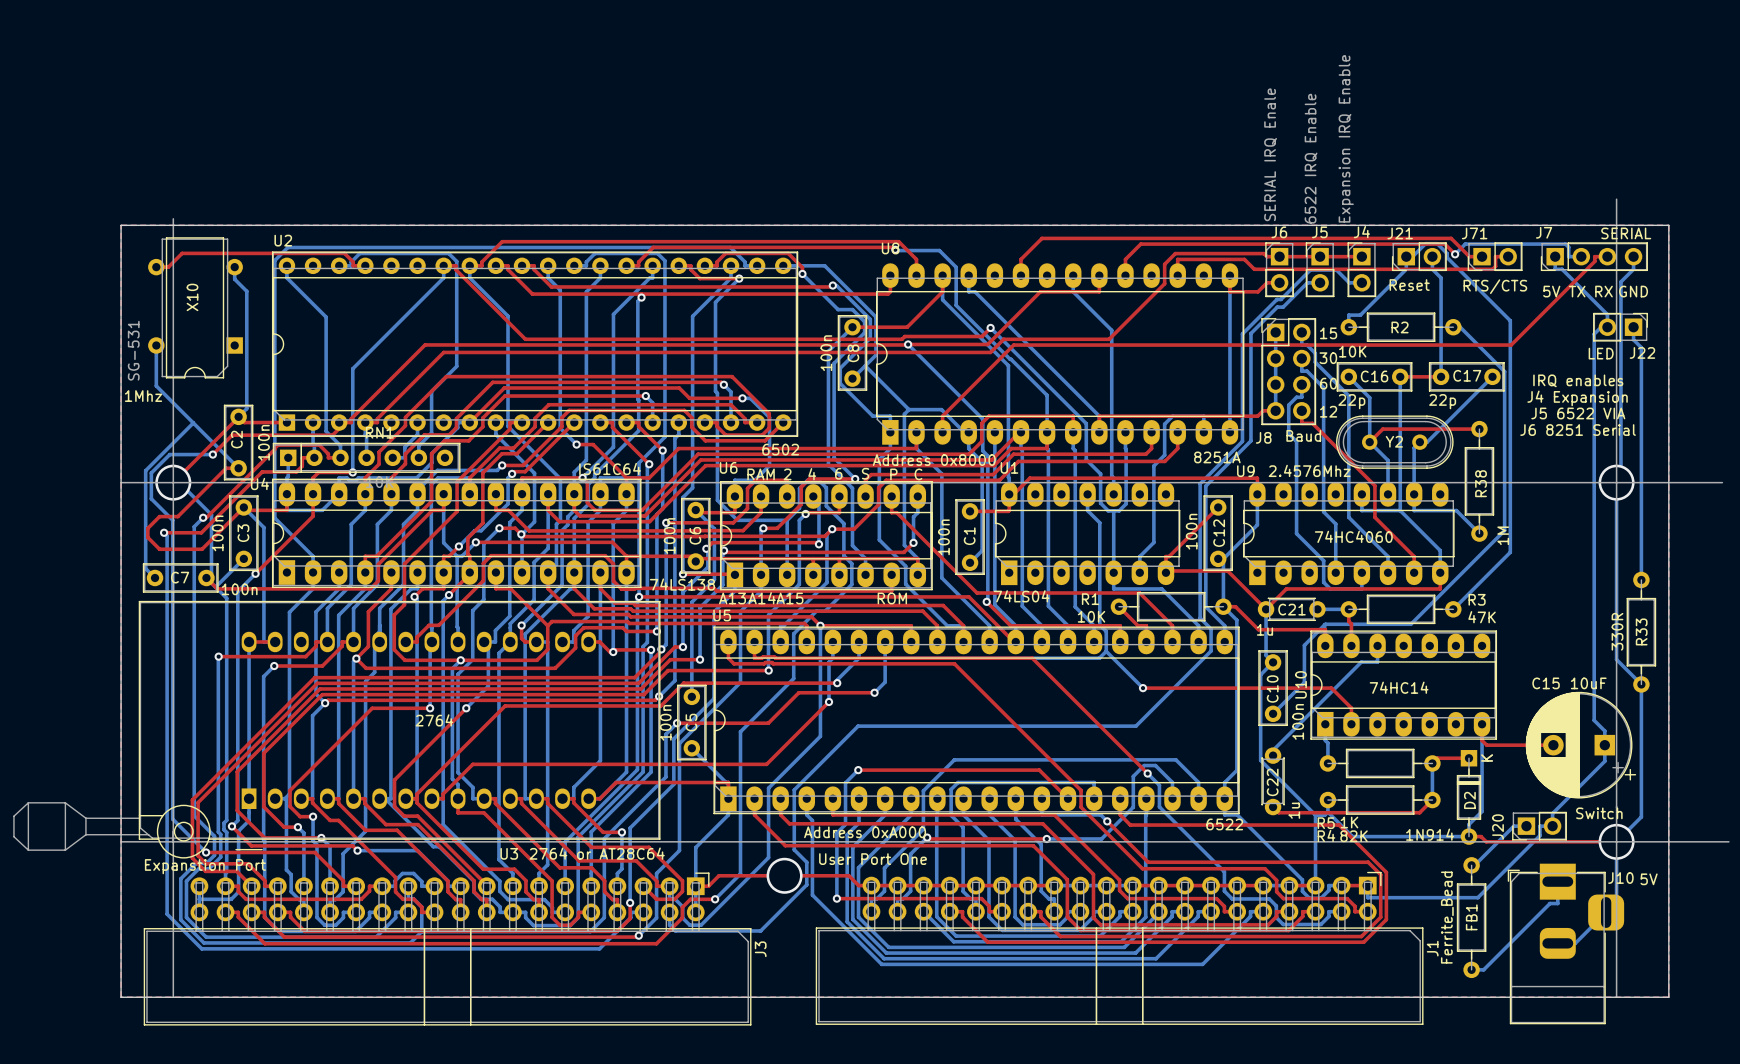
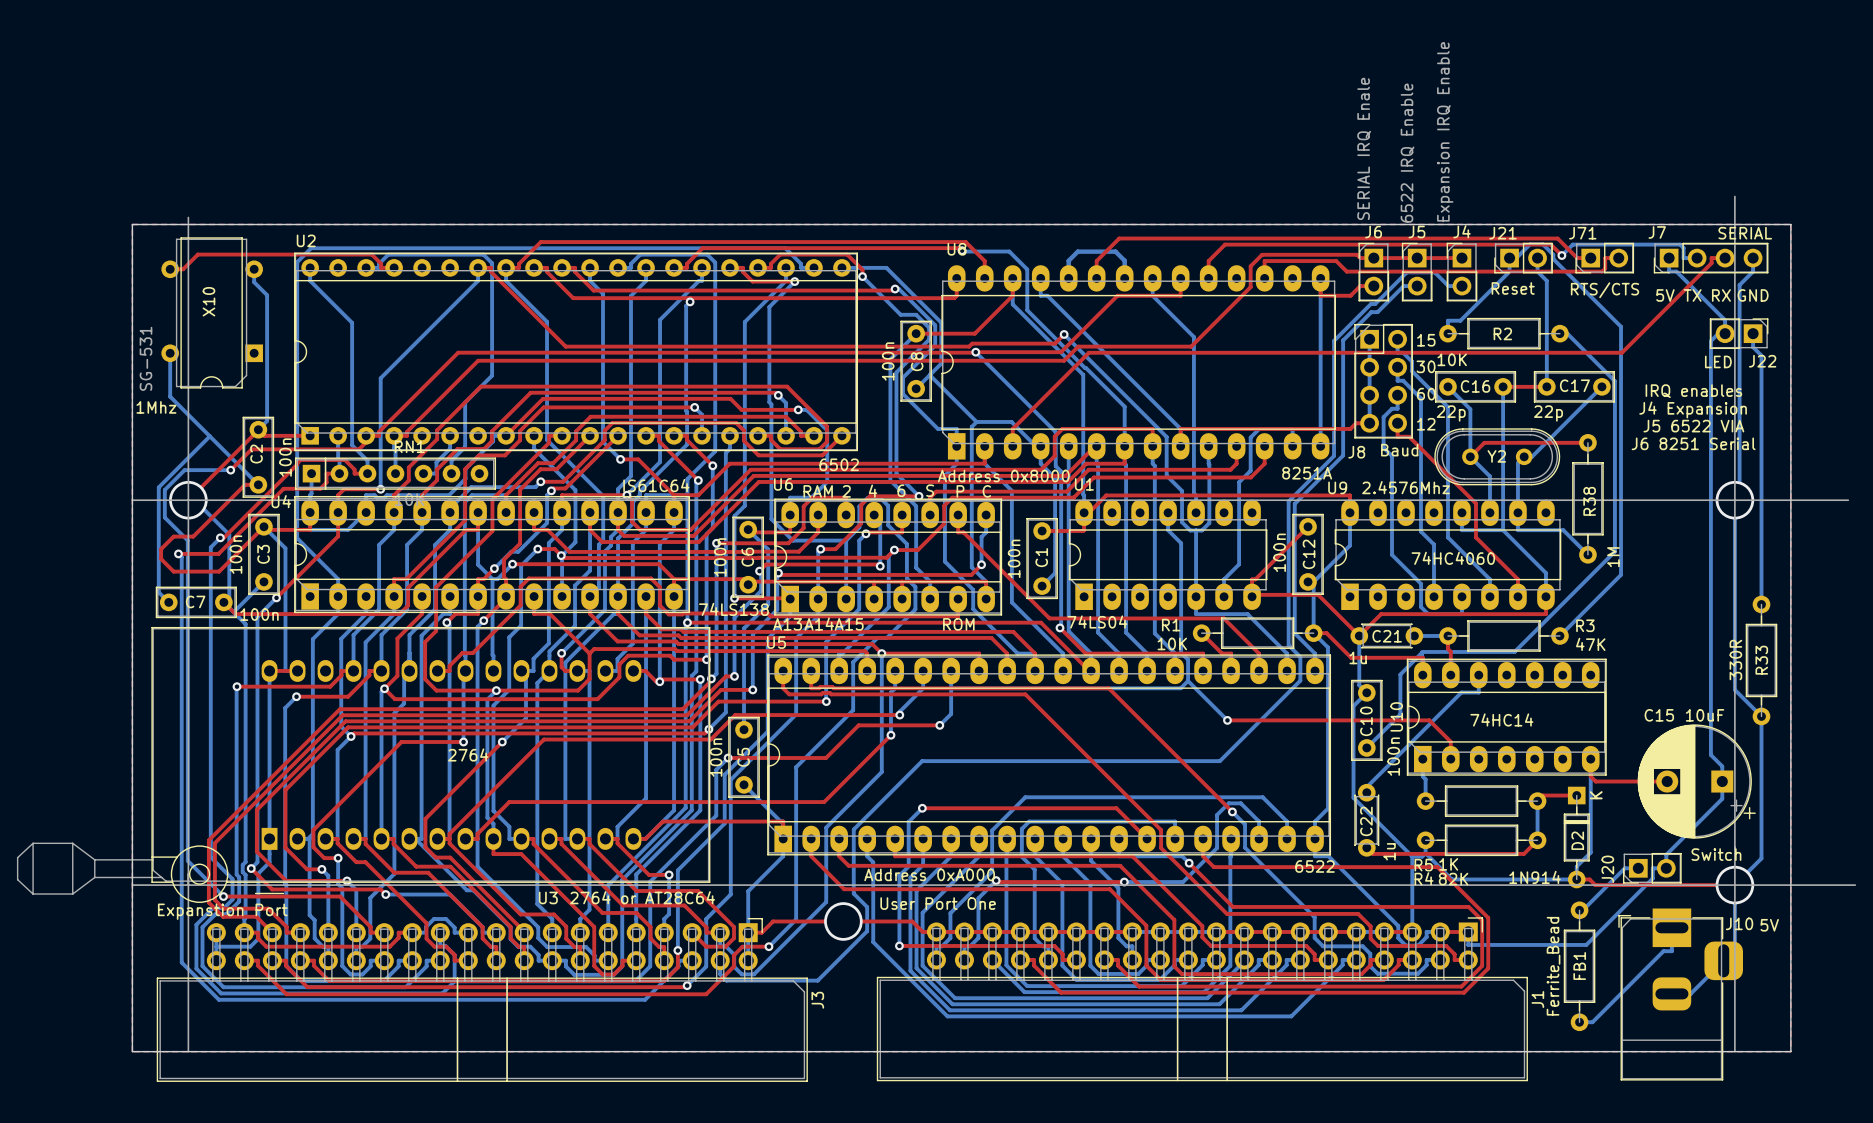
bottom track: none -> (1068, 278) (1068, 260) (1077, 251) (1115, 251) (1124, 260) (1124, 278)

